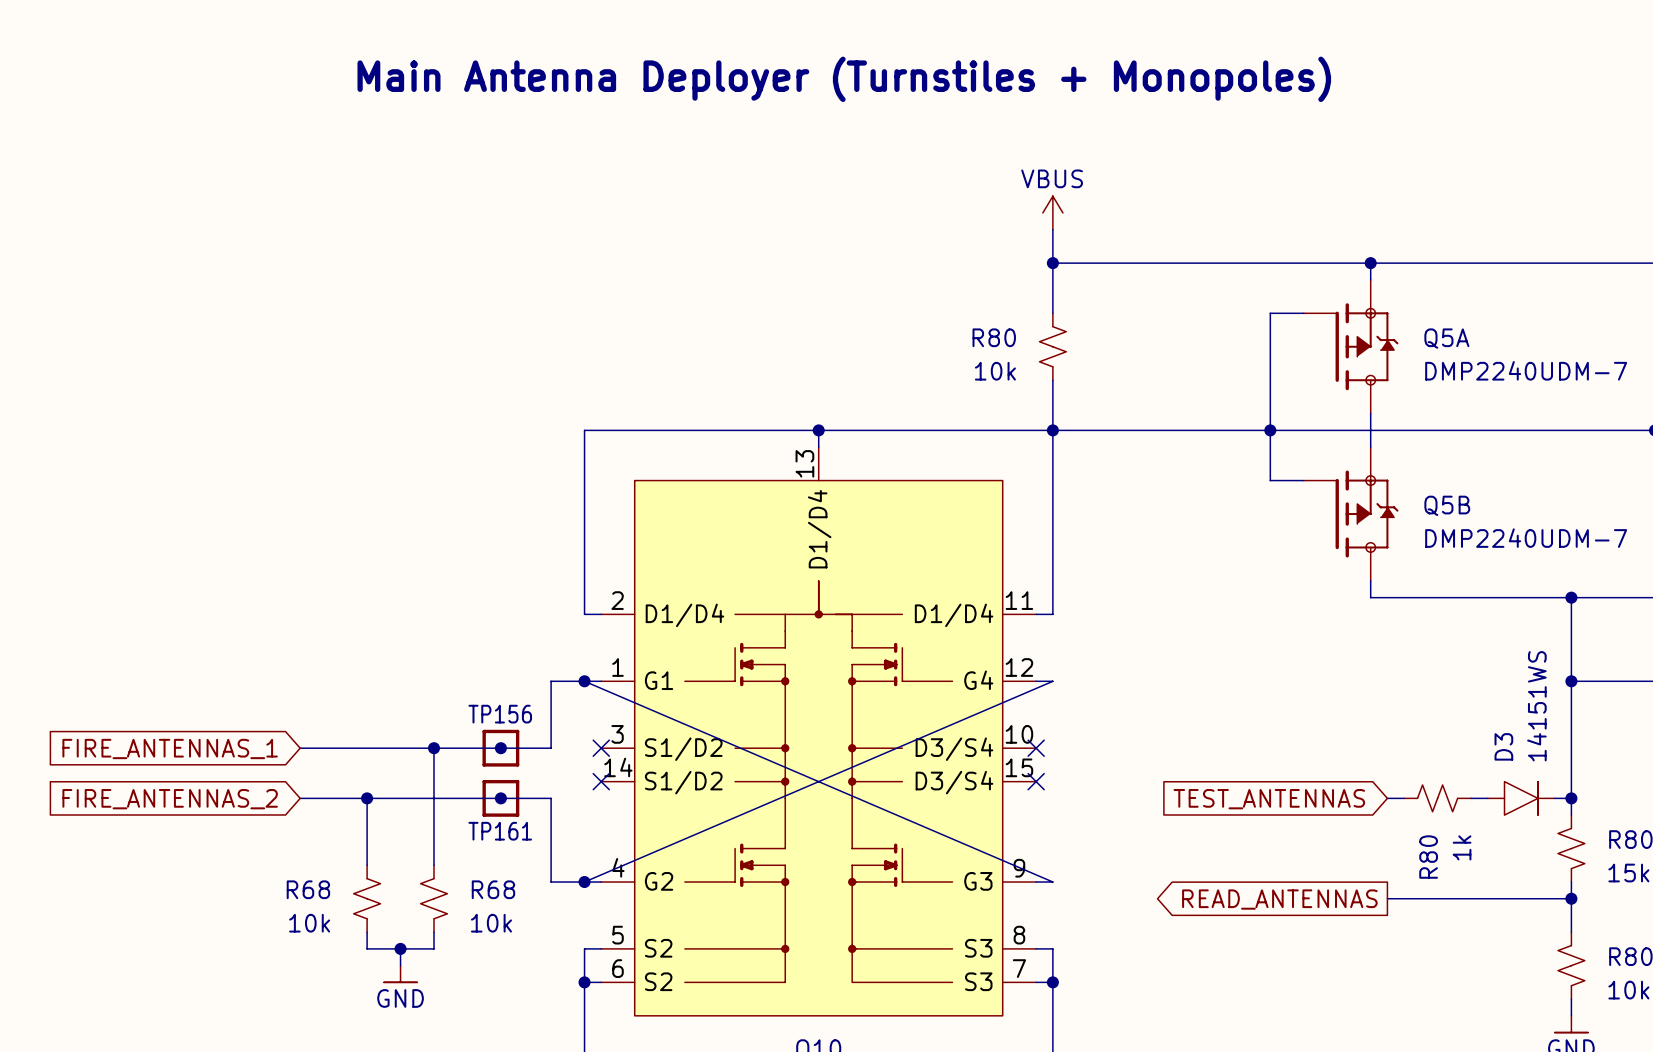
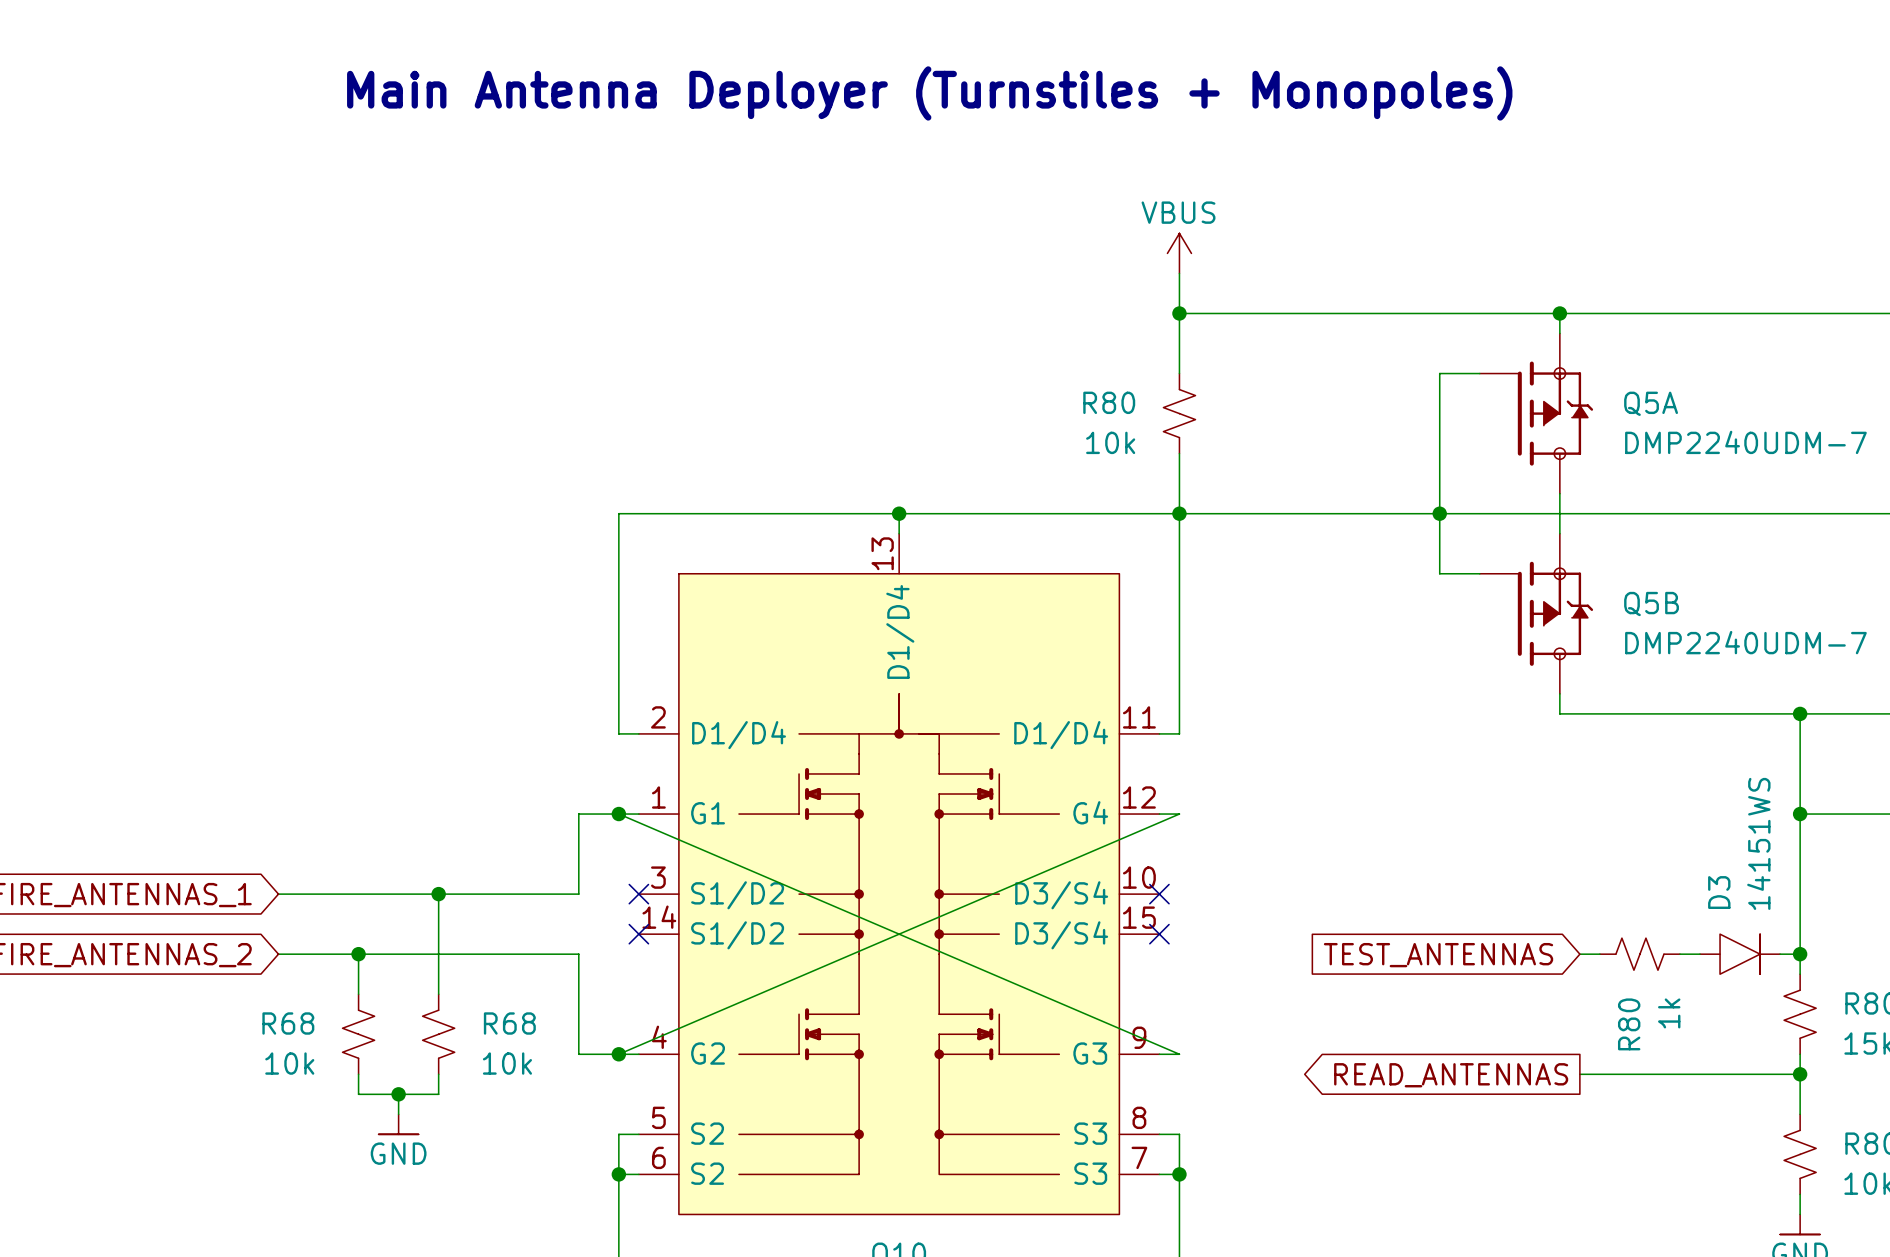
junction: (500, 748) -> none
TP156: (500, 748) -> none
junction: (500, 798) -> none
TP161: (500, 798) -> none
wire: (367, 831) (367, 865) -> none
wire: (434, 831) (434, 865) -> none
R68 position: (367, 898) -> (358, 1034)
R68 position: (434, 898) -> (438, 1034)
wire: (367, 932) (367, 948) (434, 948) (434, 932) -> (358, 1074) (358, 1094) (438, 1094) (438, 1074)
wire: (400, 948) (400, 965) -> (398, 1094) (398, 1114)
junction position: (400, 948) -> (398, 1094)
power symbol position: GND (400, 974) -> GND (398, 1124)

